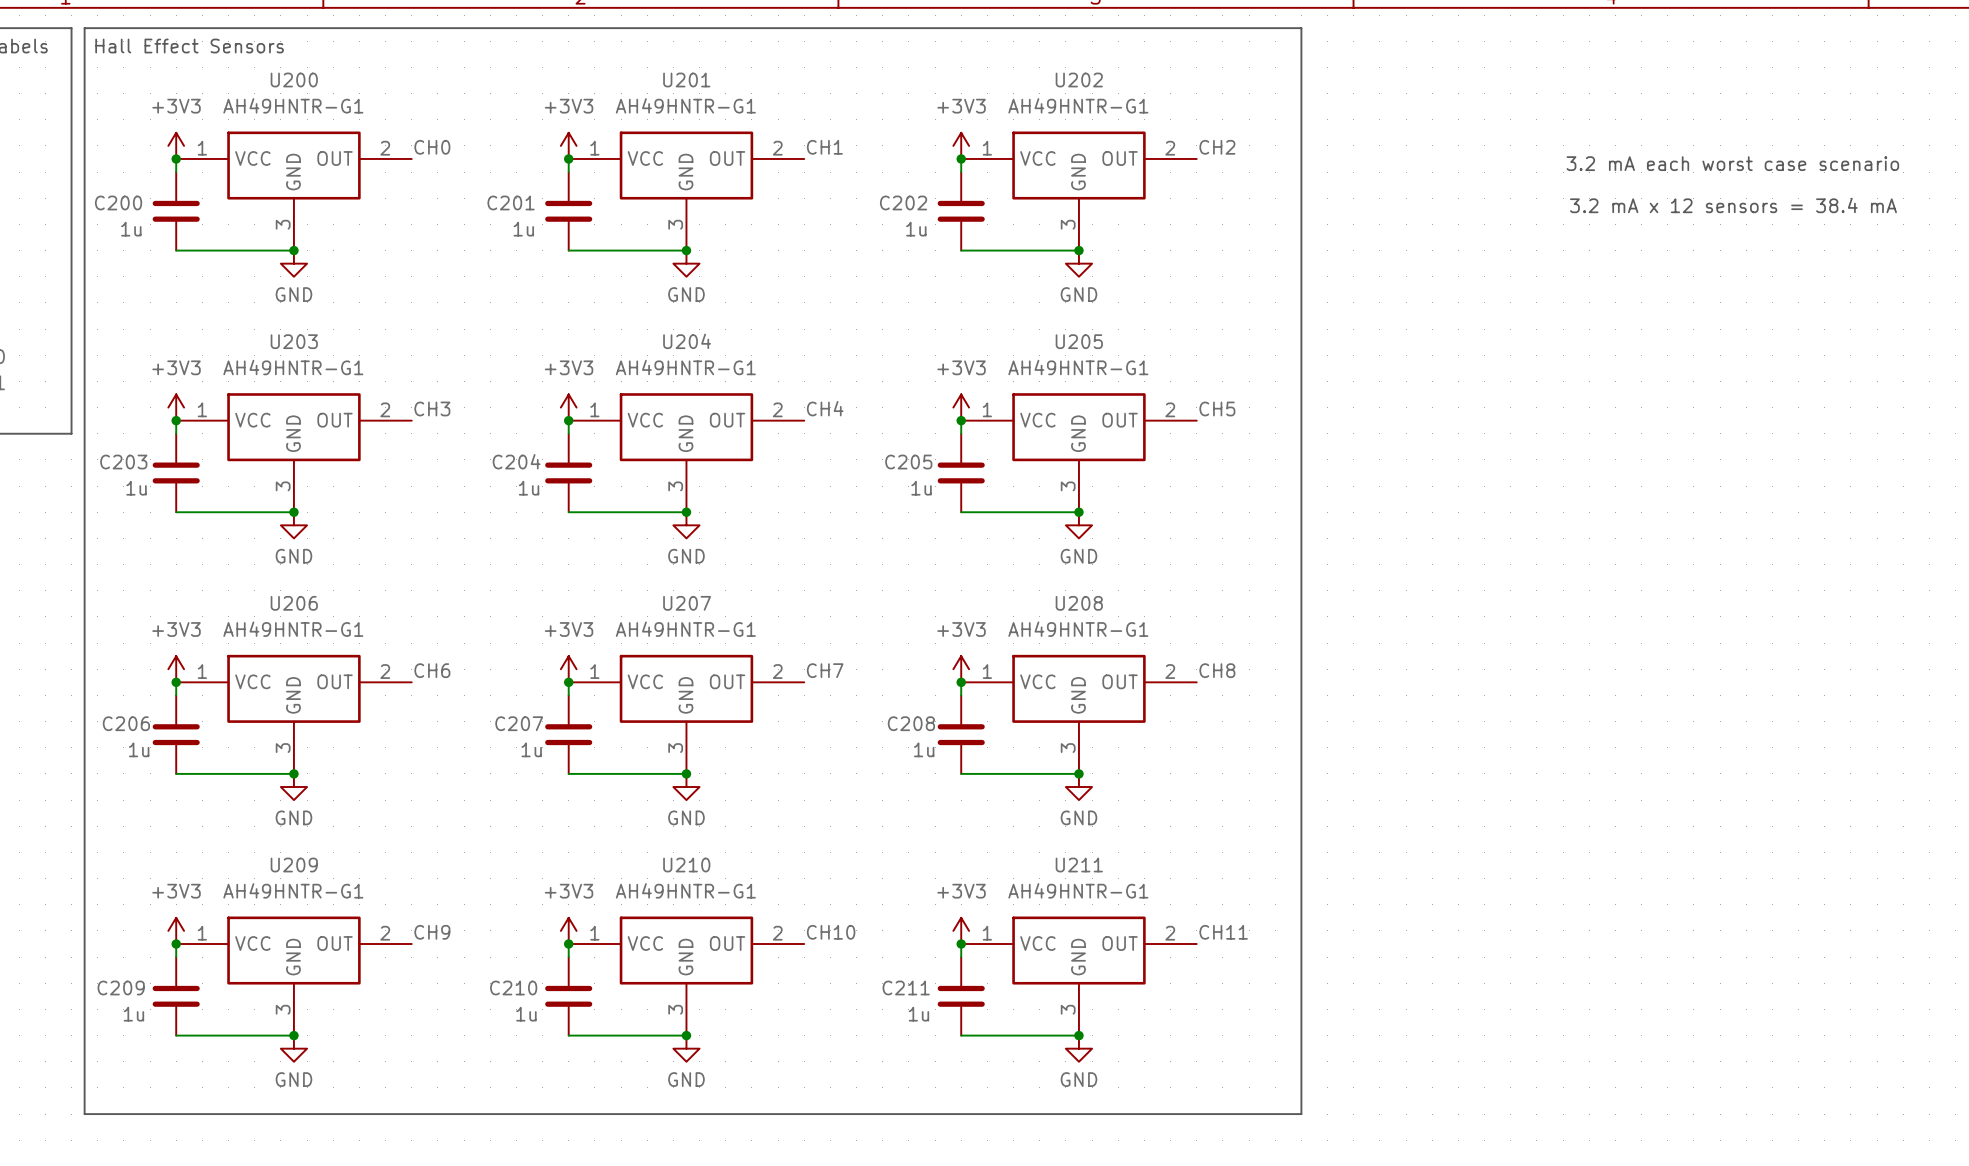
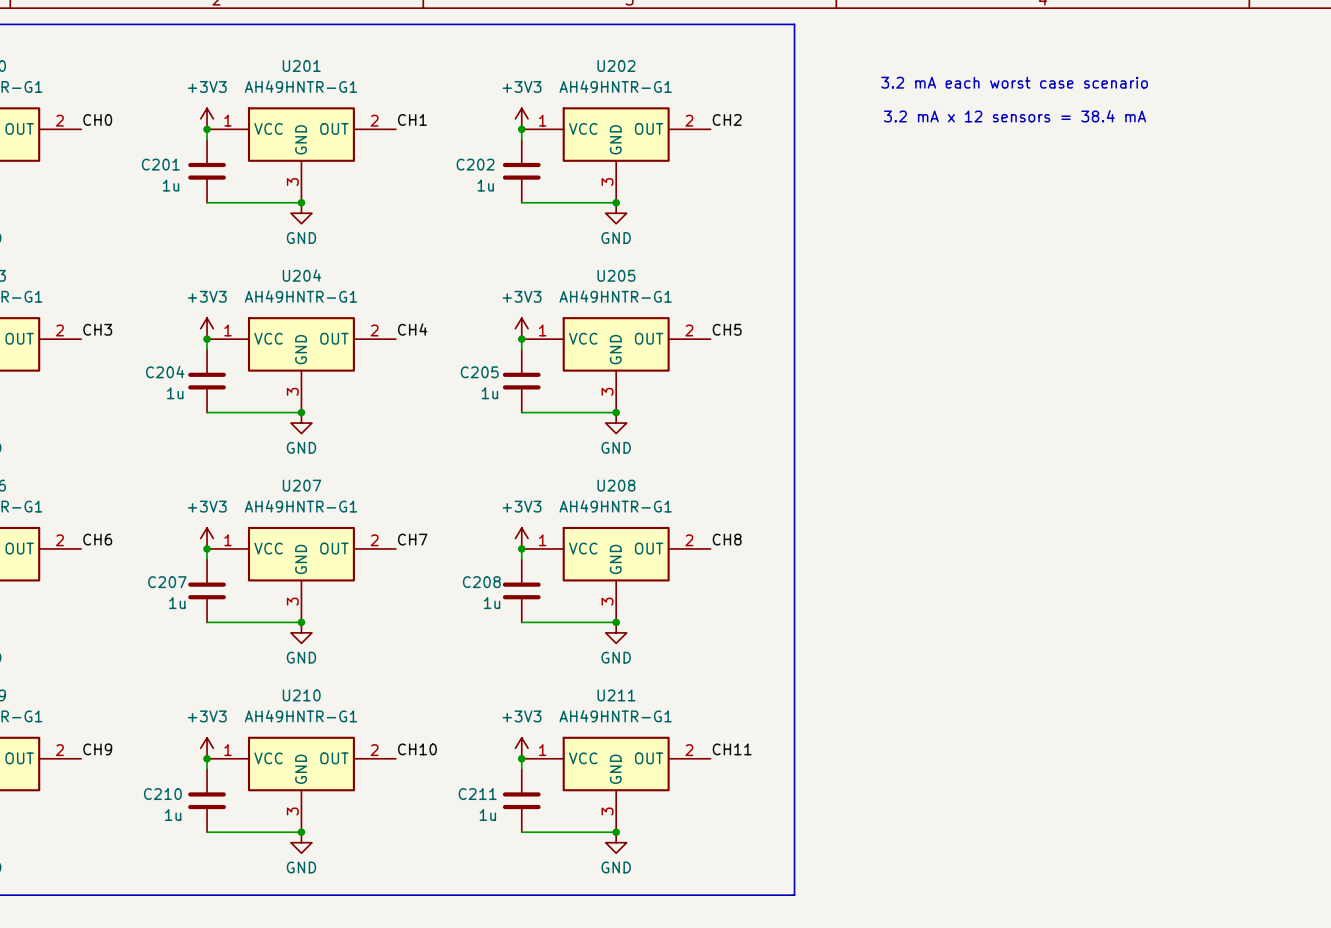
text position: 3.2 mA each worst case scenario (1732, 163) -> 3.2 mA each worst case scenario (1014, 82)
text position: 3.2 mA x 12 sensors = 38.4 mA (1733, 205) -> 3.2 mA x 12 sensors = 38.4 mA (1015, 116)

